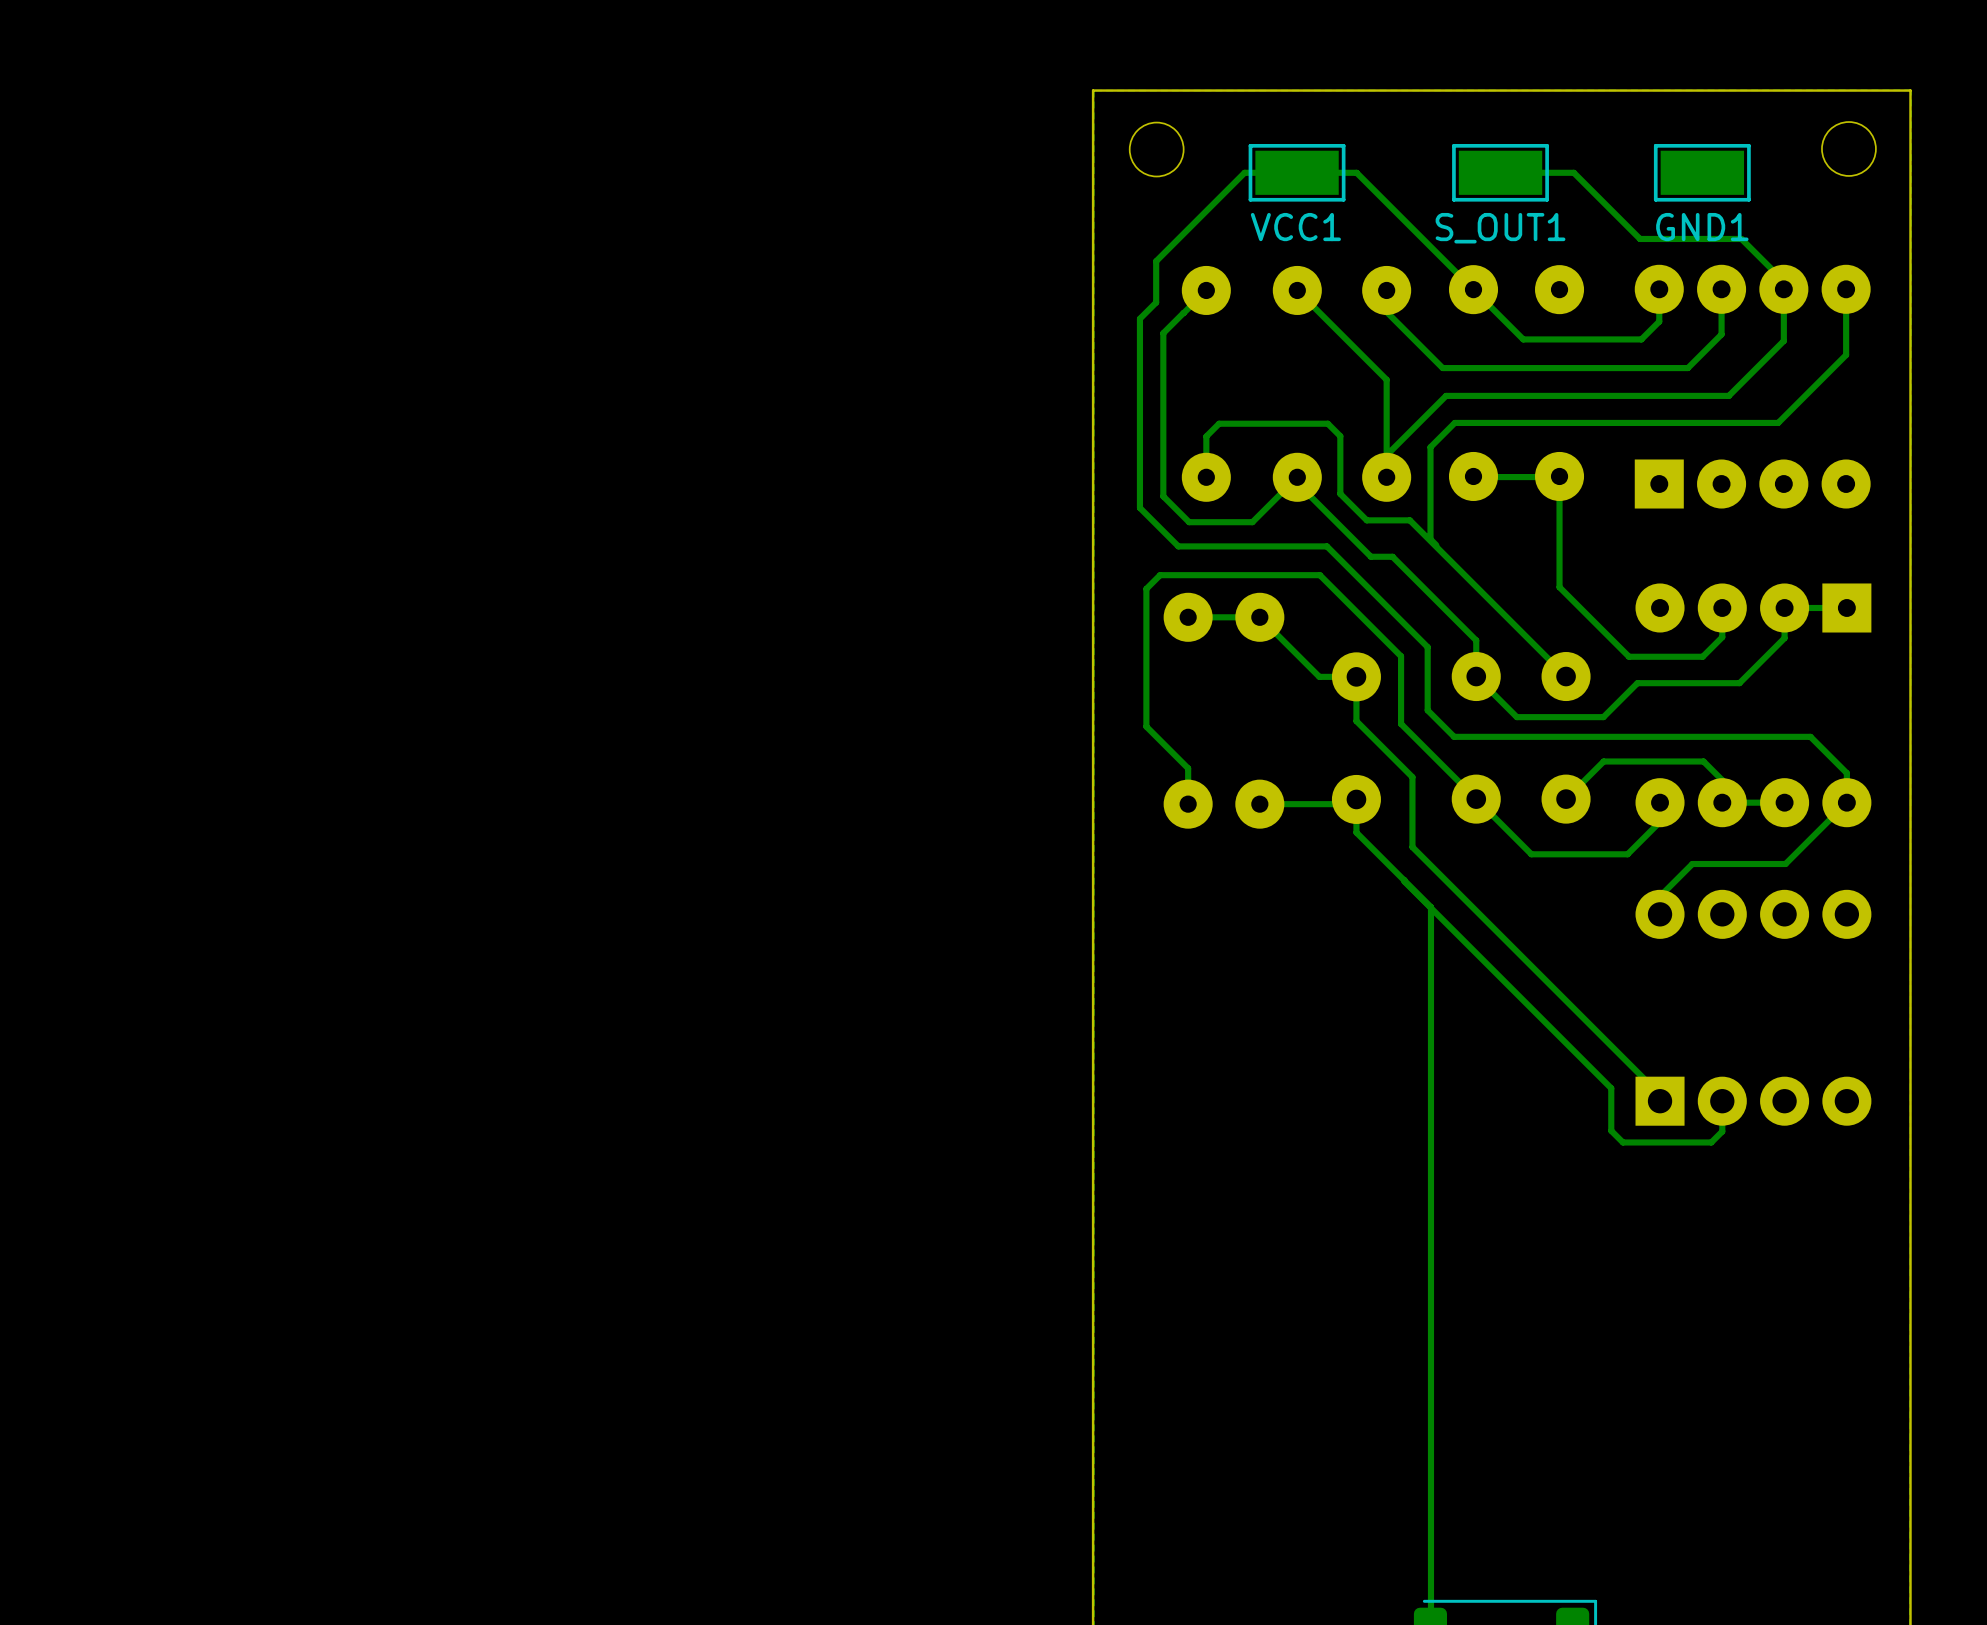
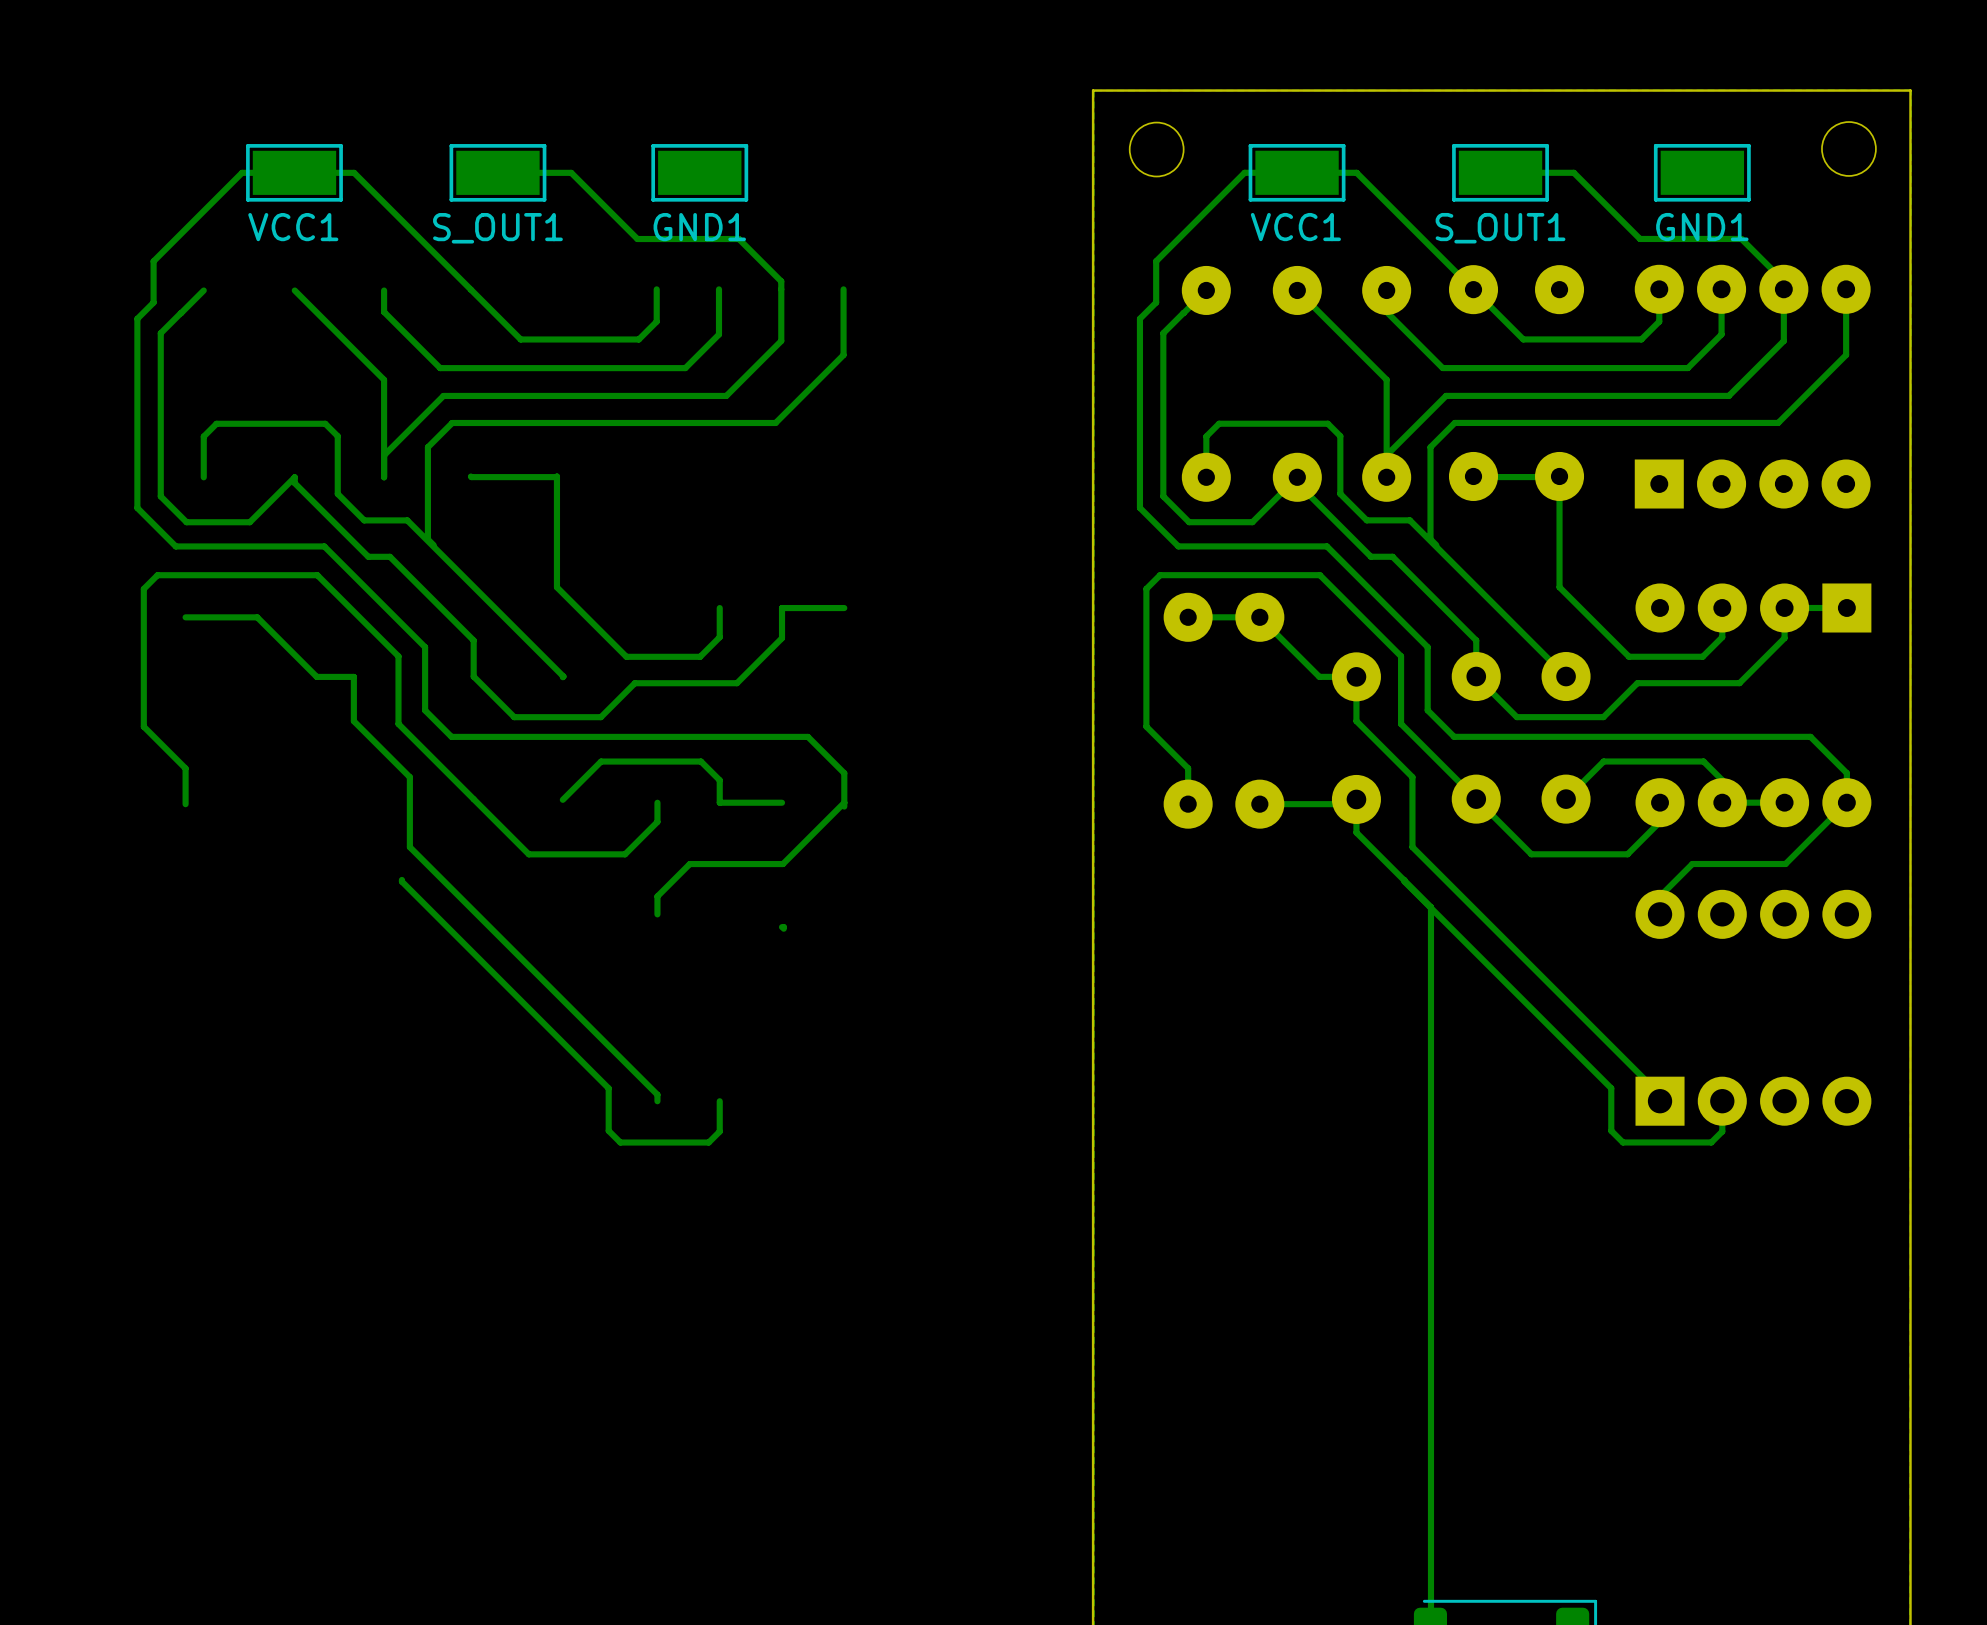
VCC1: none -> (294, 172)
S_OUT1: none -> (497, 172)
bottom track: none -> (520, 172) (571, 172) (637, 239) (738, 239) (781, 281) (781, 340) (726, 395) (443, 395) (384, 455)
GND1: none -> (699, 172)
bottom track: none -> (656, 289) (656, 321) (638, 339) (520, 339) (354, 172) (242, 172) (153, 261) (153, 302) (137, 318) (137, 508) (175, 546) (324, 546) (425, 647) (425, 710) (451, 736) (807, 736) (844, 773) (844, 806)
bottom track: none -> (718, 289) (718, 334) (685, 368) (440, 368) (384, 312) (384, 290)
bottom track: none -> (843, 289) (843, 355) (775, 422) (452, 422) (427, 447) (427, 539) (433, 545)
bottom track: none -> (203, 290) (181, 313)
bottom track: none -> (294, 290) (384, 379) (384, 477)
bottom track: none -> (180, 313) (160, 333) (160, 496) (186, 522) (249, 522) (294, 477) (294, 483) (368, 556) (389, 556) (473, 640) (473, 676) (514, 717) (600, 717) (634, 683) (736, 683) (782, 638) (782, 608) (844, 608)
bottom track: none -> (470, 476) (556, 476) (556, 587) (626, 656) (700, 656) (719, 637) (719, 608)
bottom track: none -> (203, 477) (203, 436) (216, 423) (325, 423) (337, 436) (337, 493) (364, 520) (407, 520) (562, 677)
bottom track: none -> (185, 617) (257, 617) (316, 676) (353, 676) (353, 721) (409, 777) (409, 847) (657, 1094) (657, 1101)
bottom track: none -> (562, 799) (601, 761) (701, 761) (719, 780) (719, 802) (782, 802)
bottom track: none -> (657, 802) (657, 821) (625, 854) (528, 854) (398, 723) (398, 656) (317, 575) (157, 575) (143, 588) (143, 726) (185, 768) (185, 804)
bottom track: none -> (844, 802) (782, 864) (689, 864) (657, 896) (657, 914)
bottom track: none -> (401, 879) (608, 1088) (608, 1130) (620, 1142) (708, 1142) (719, 1131) (719, 1101)
bottom track: none -> (782, 927) (783, 928)

